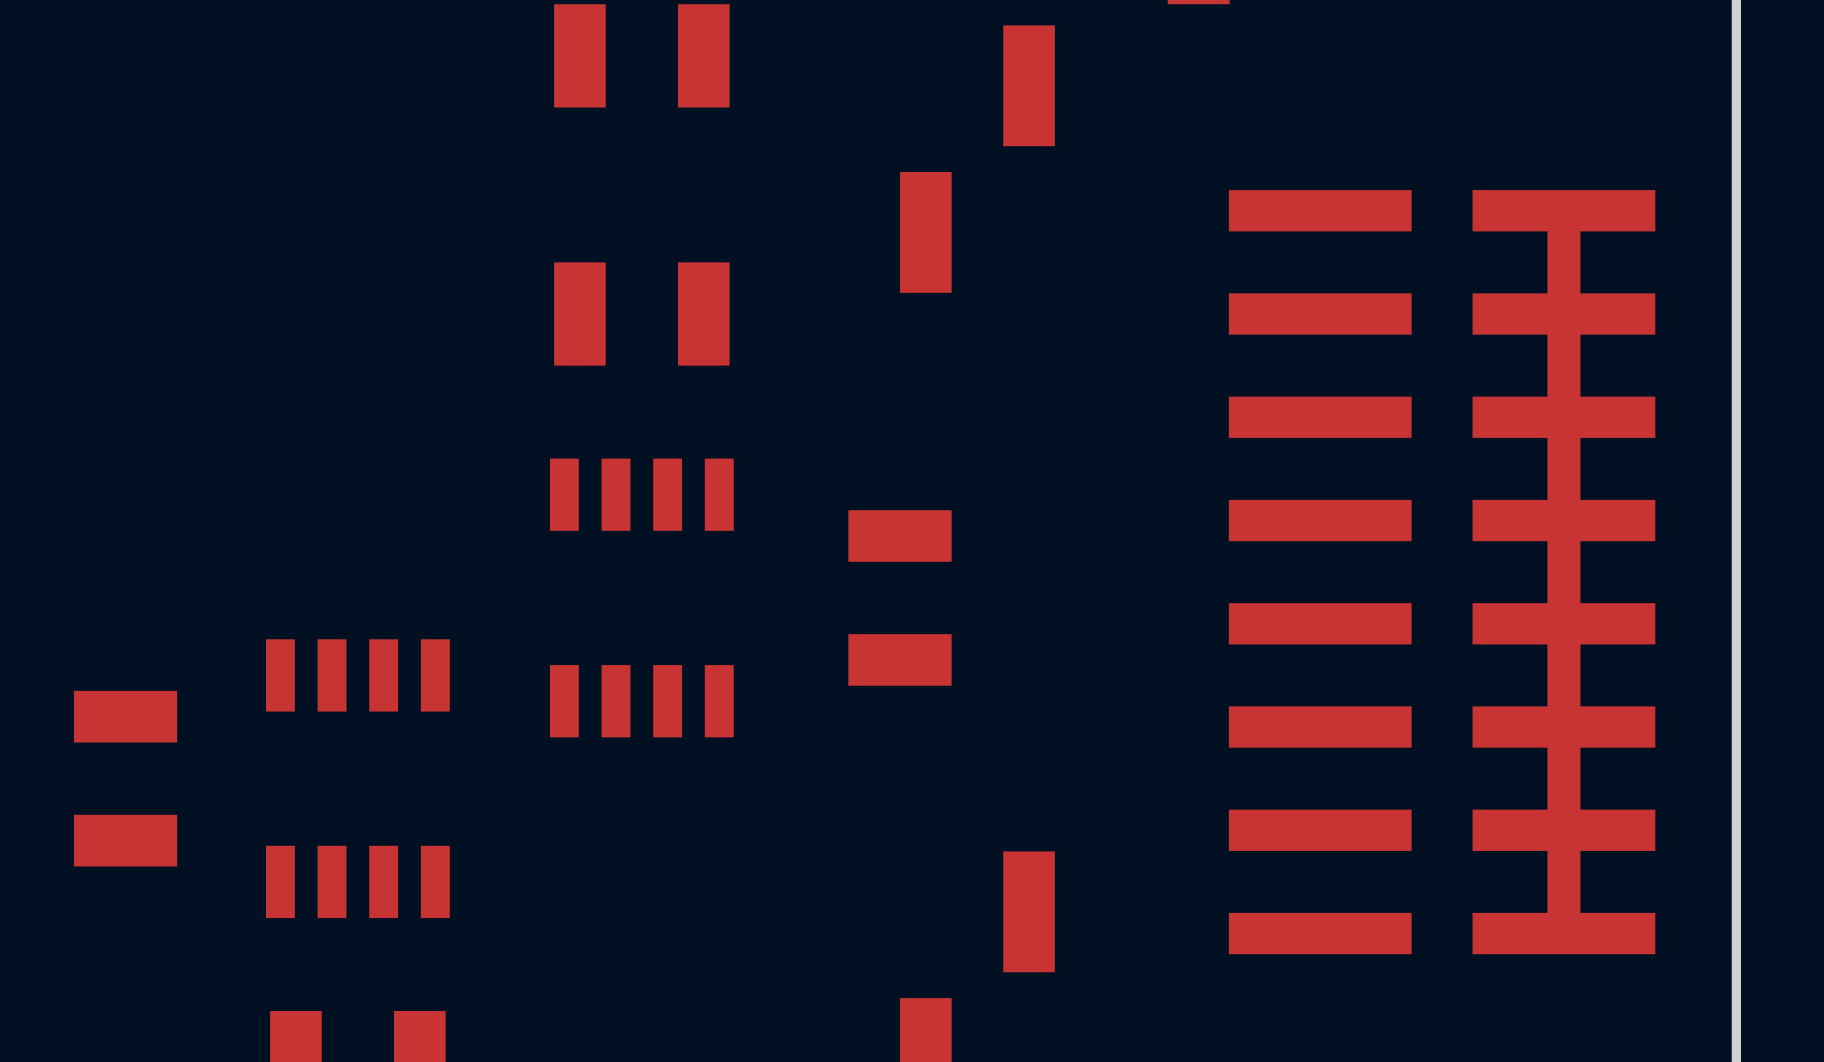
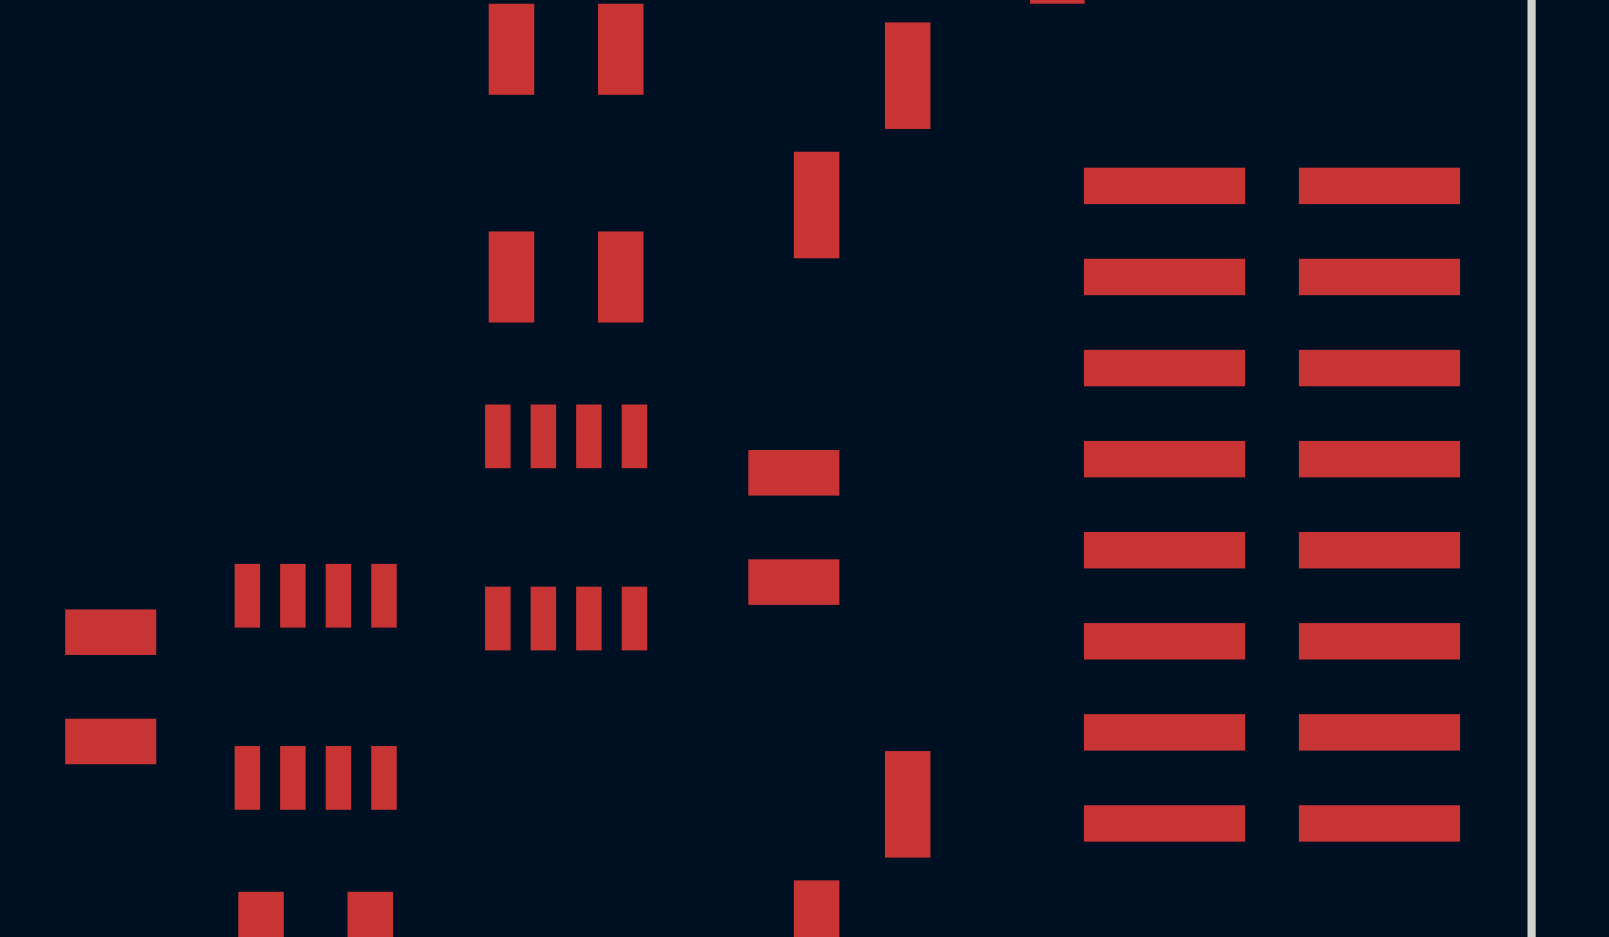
top track: (1563, 210) (1563, 933) -> none

